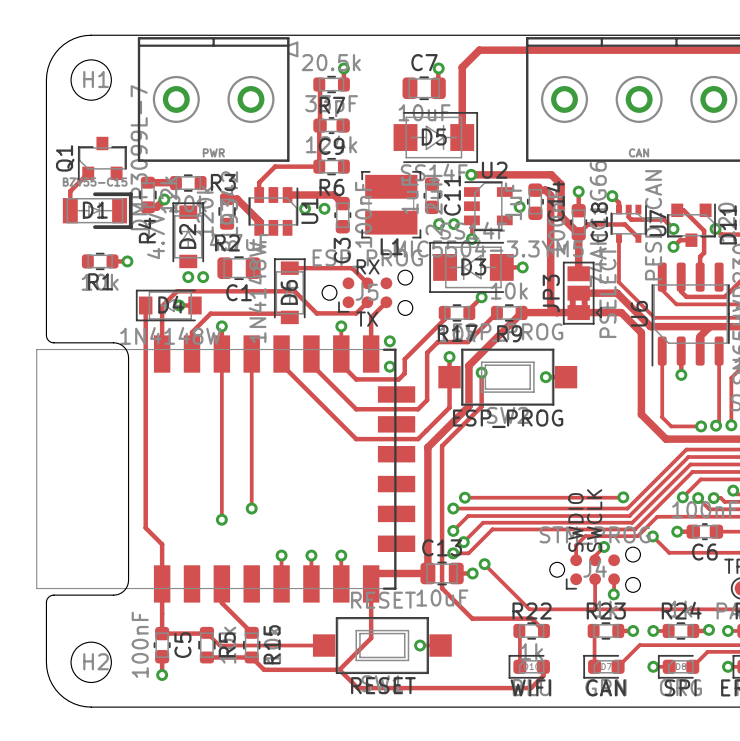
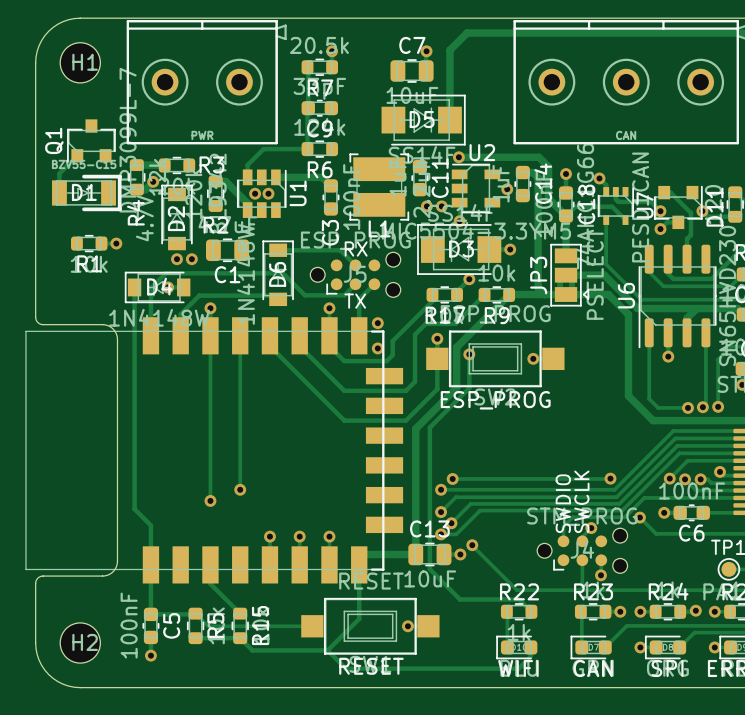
via: (305, 208) -> none
via: (324, 208) -> none
via: none -> (255, 193)
via: none -> (268, 193)

